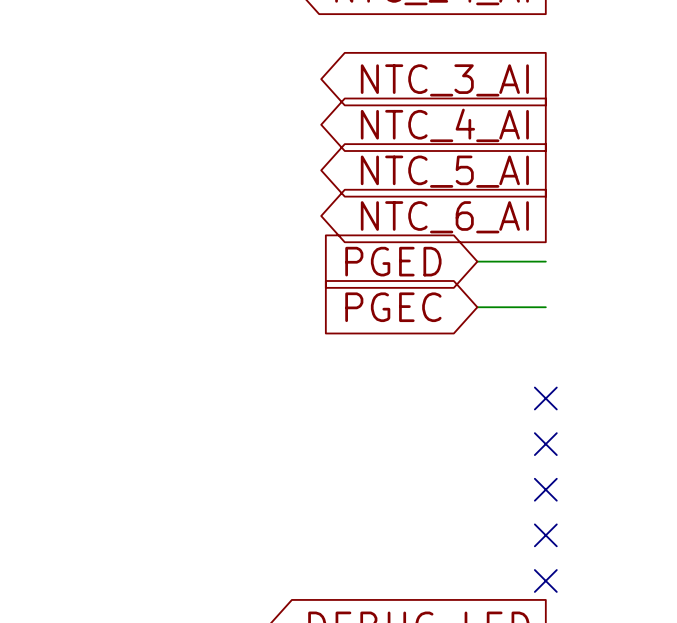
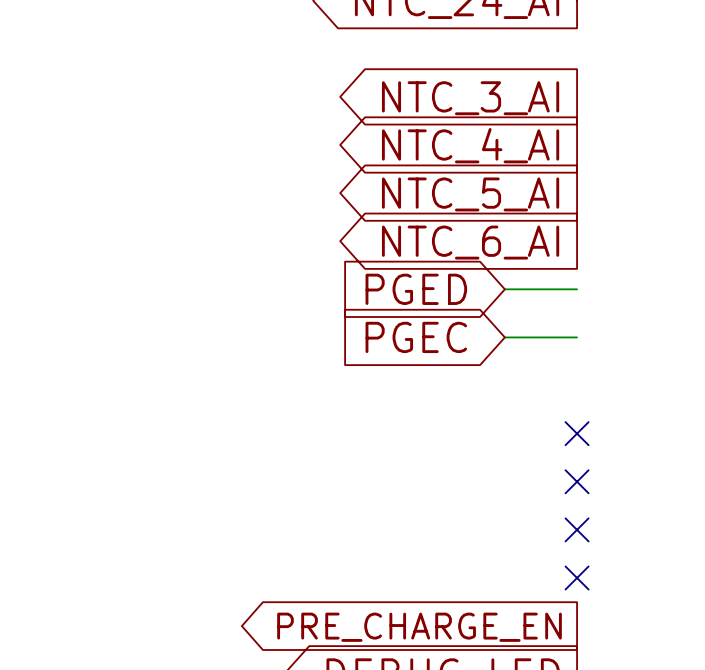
no-connect mark: (545, 580) -> none
global label: none -> PRE_CHARGE_EN (419, 627)

